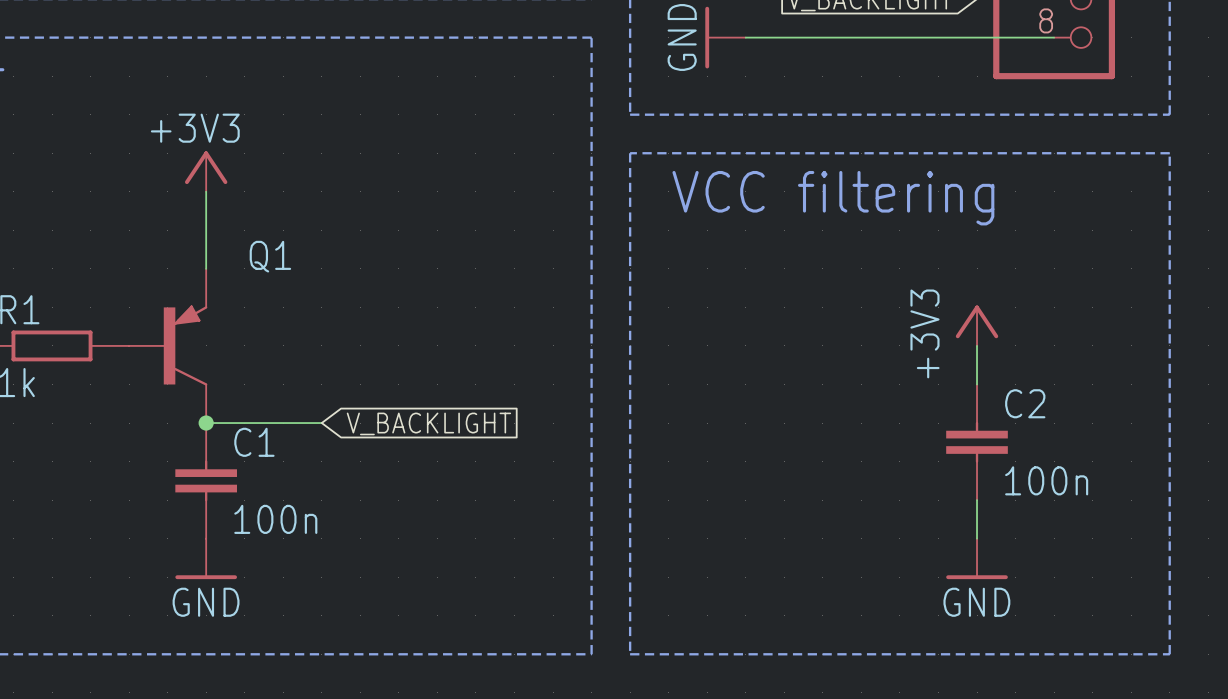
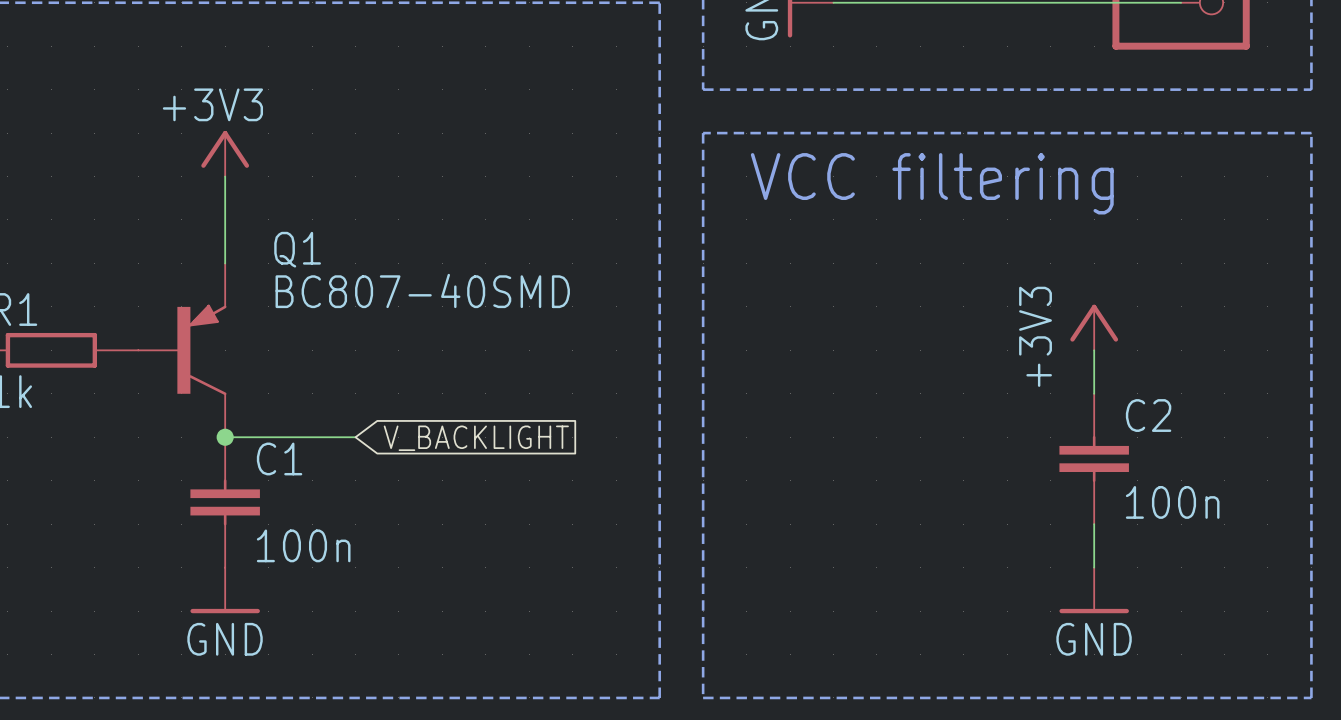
Q1 value: none -> BC807-40SMD (422, 290)

